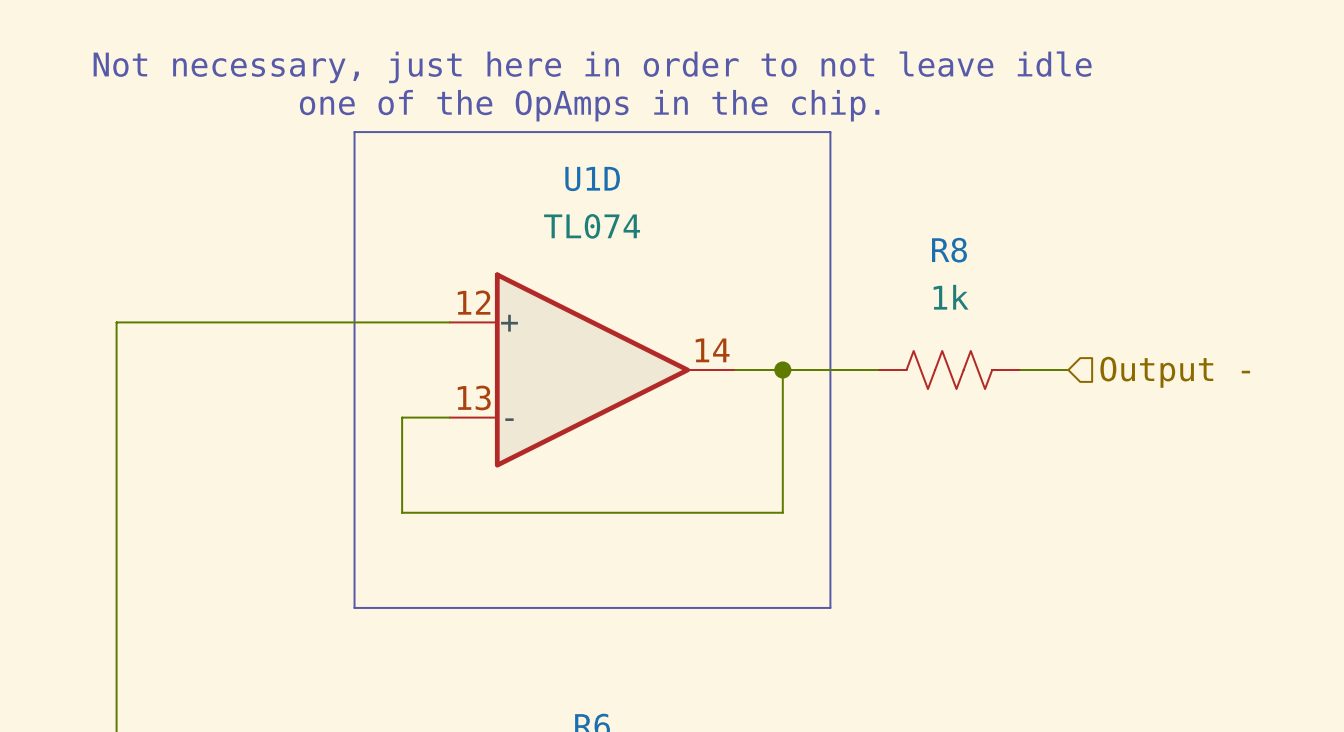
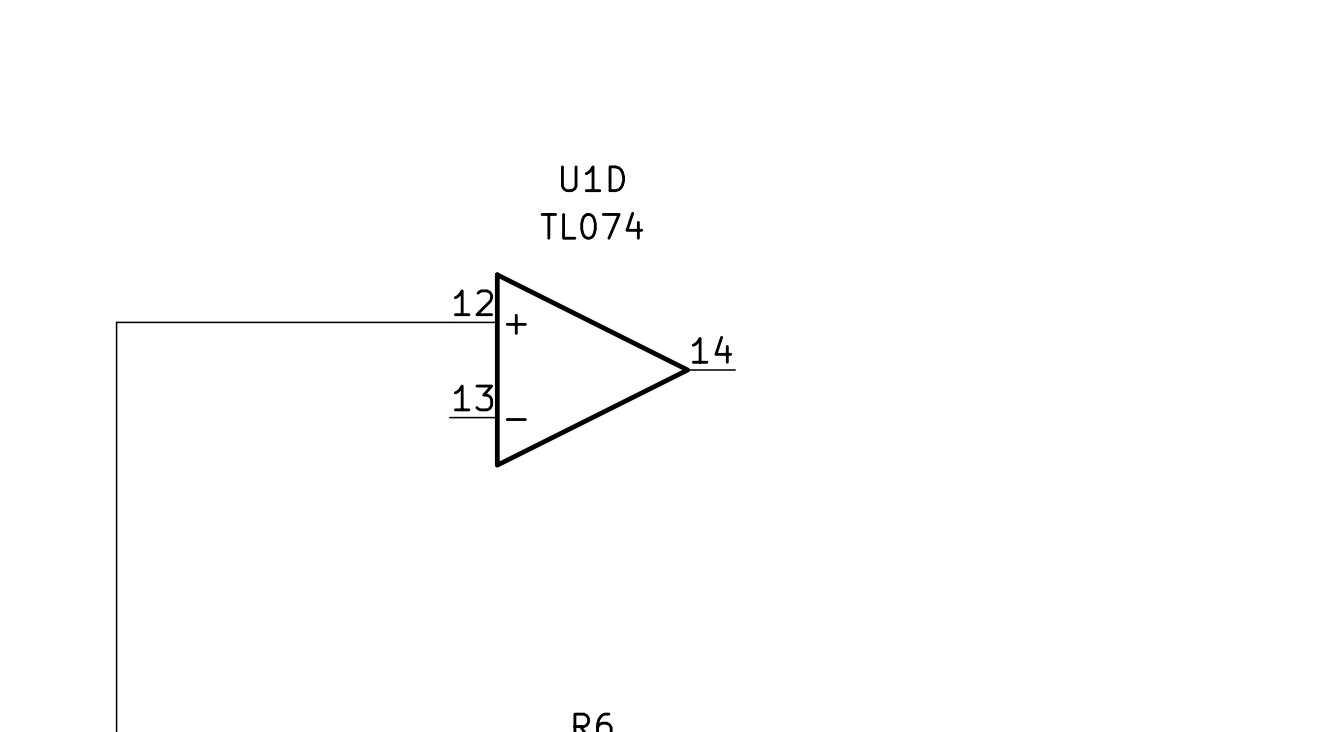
text: Not necessary, just here in order to not leave idle (592, 67) -> none
text: one of the OpAmps in the chip. (589, 105) -> none
line: (354, 132) (830, 132) (830, 607) (354, 607) (354, 132) -> none
wire: (735, 370) (877, 370) -> none
wire: (782, 370) (782, 512) (402, 512) (402, 417) (449, 417) -> none
junction: (782, 370) -> none
R8: 1k (949, 370) -> none
wire: (1020, 370) (1068, 370) -> none
hierarchical label: Output - (1175, 372) -> none

